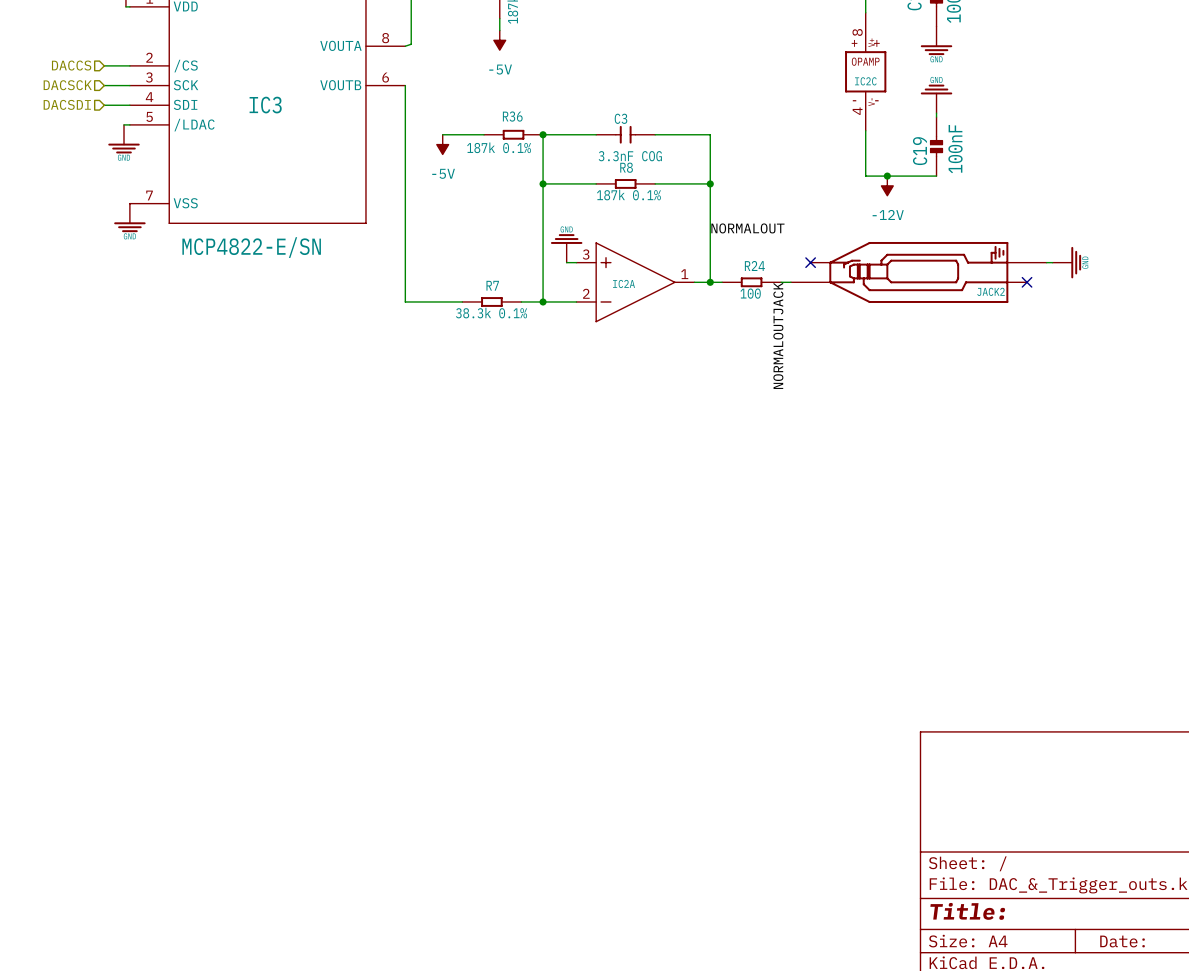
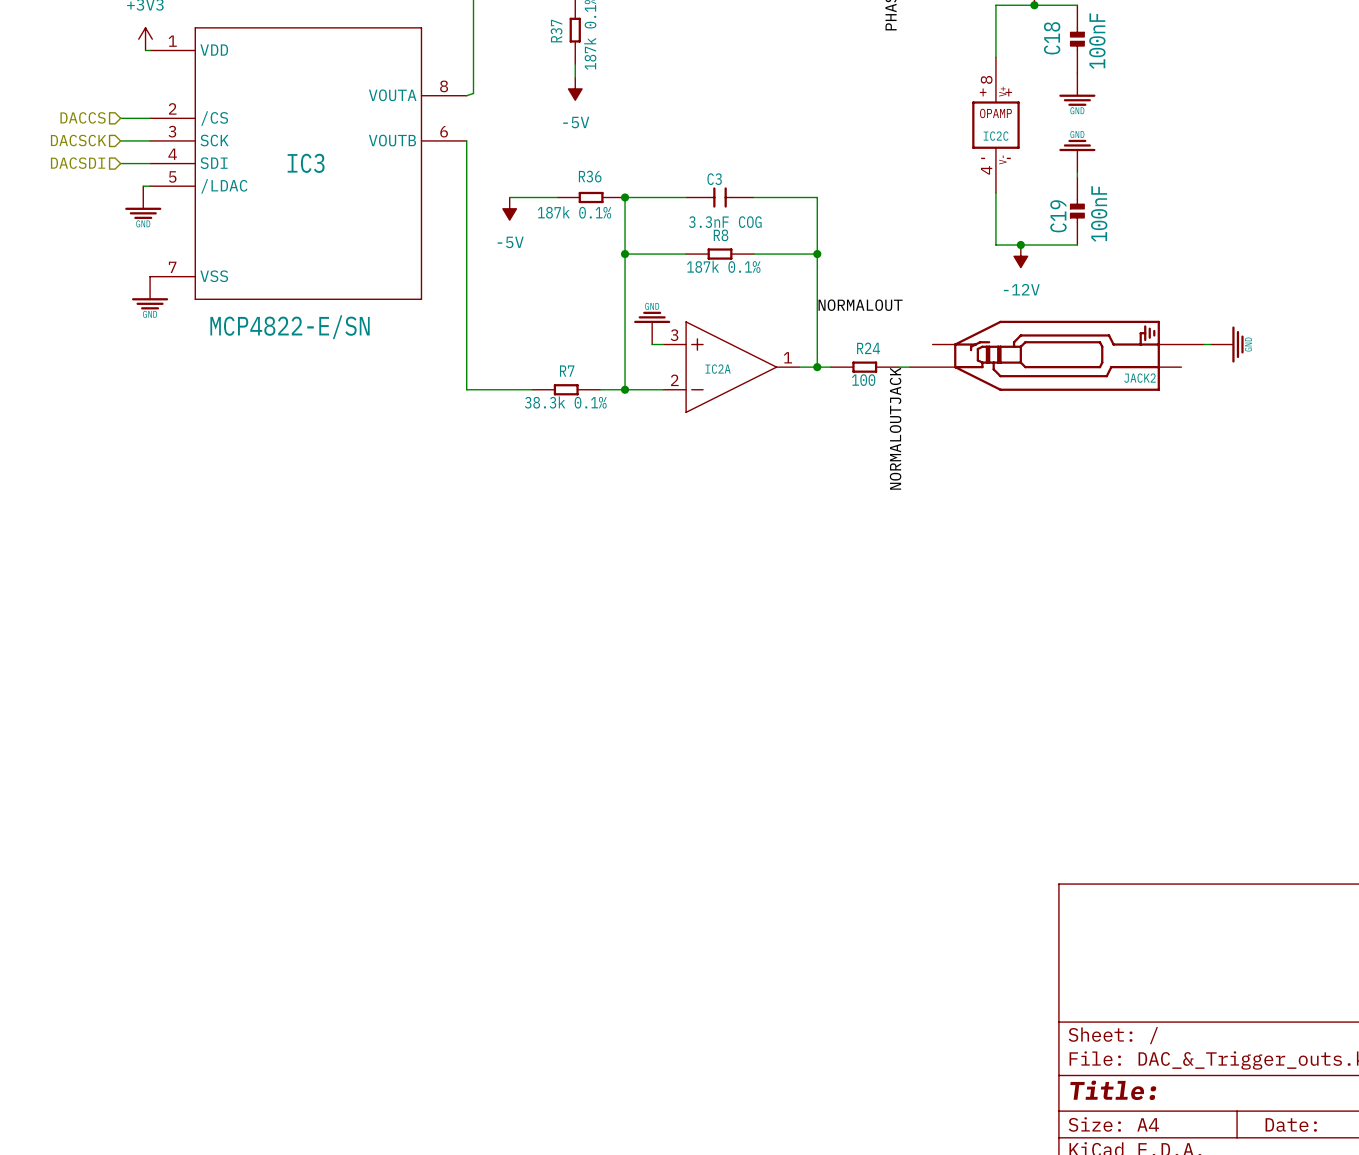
no-connect mark: (810, 262) -> none
no-connect mark: (1027, 282) -> none

